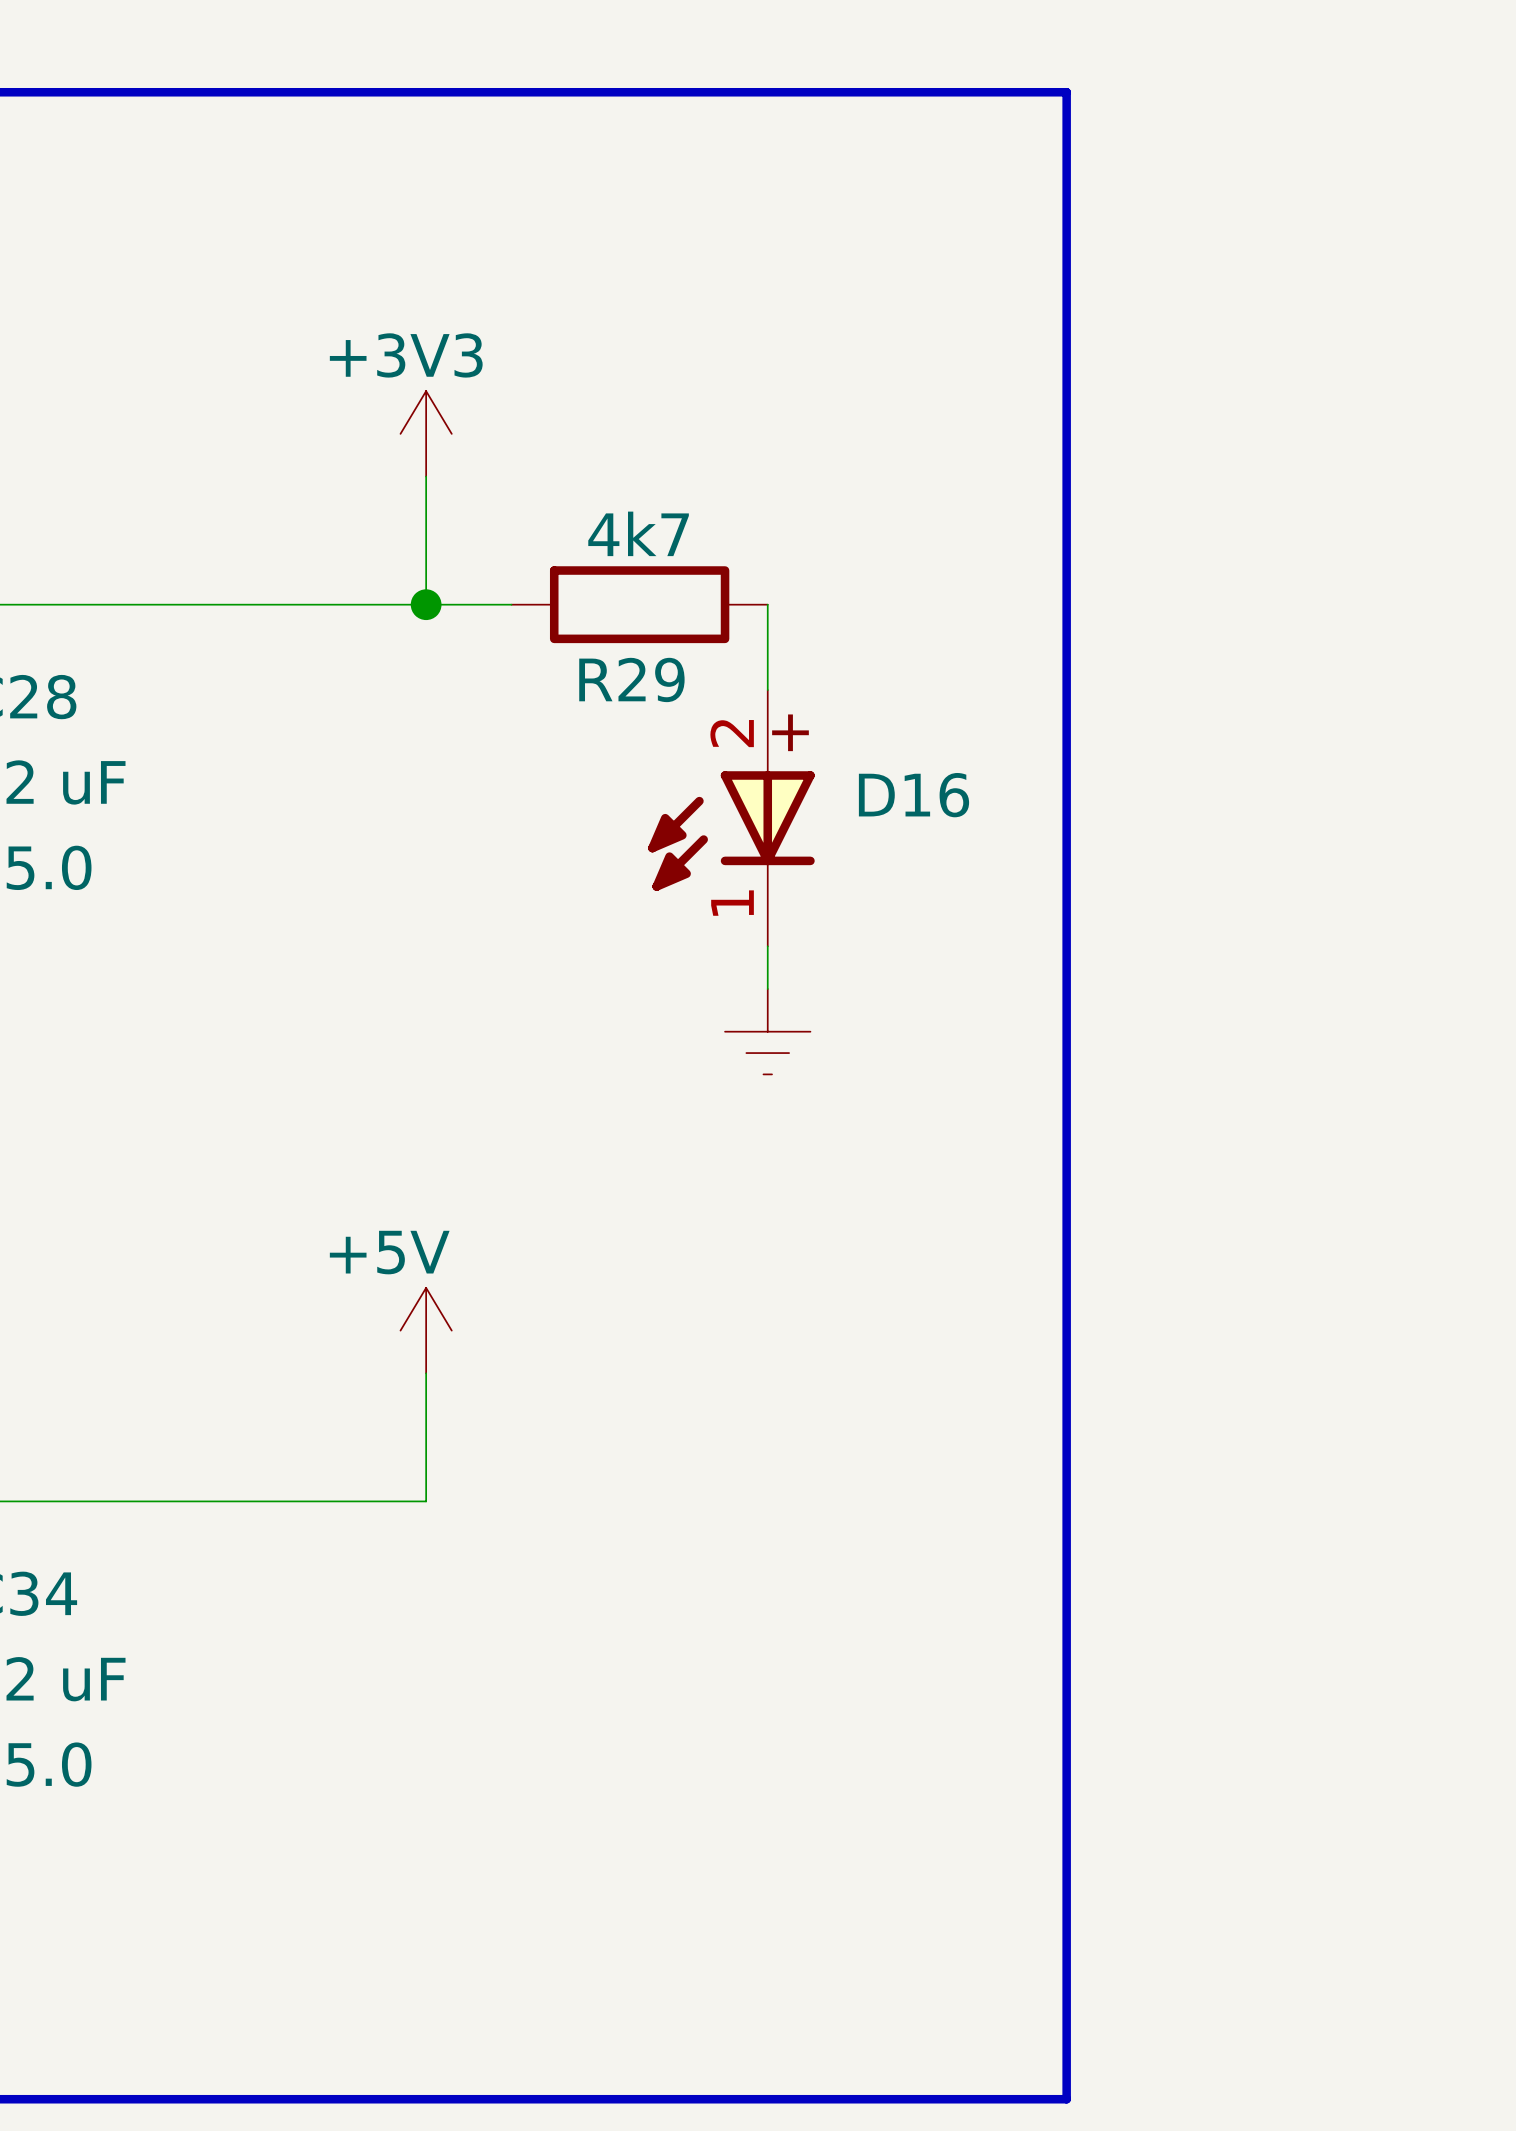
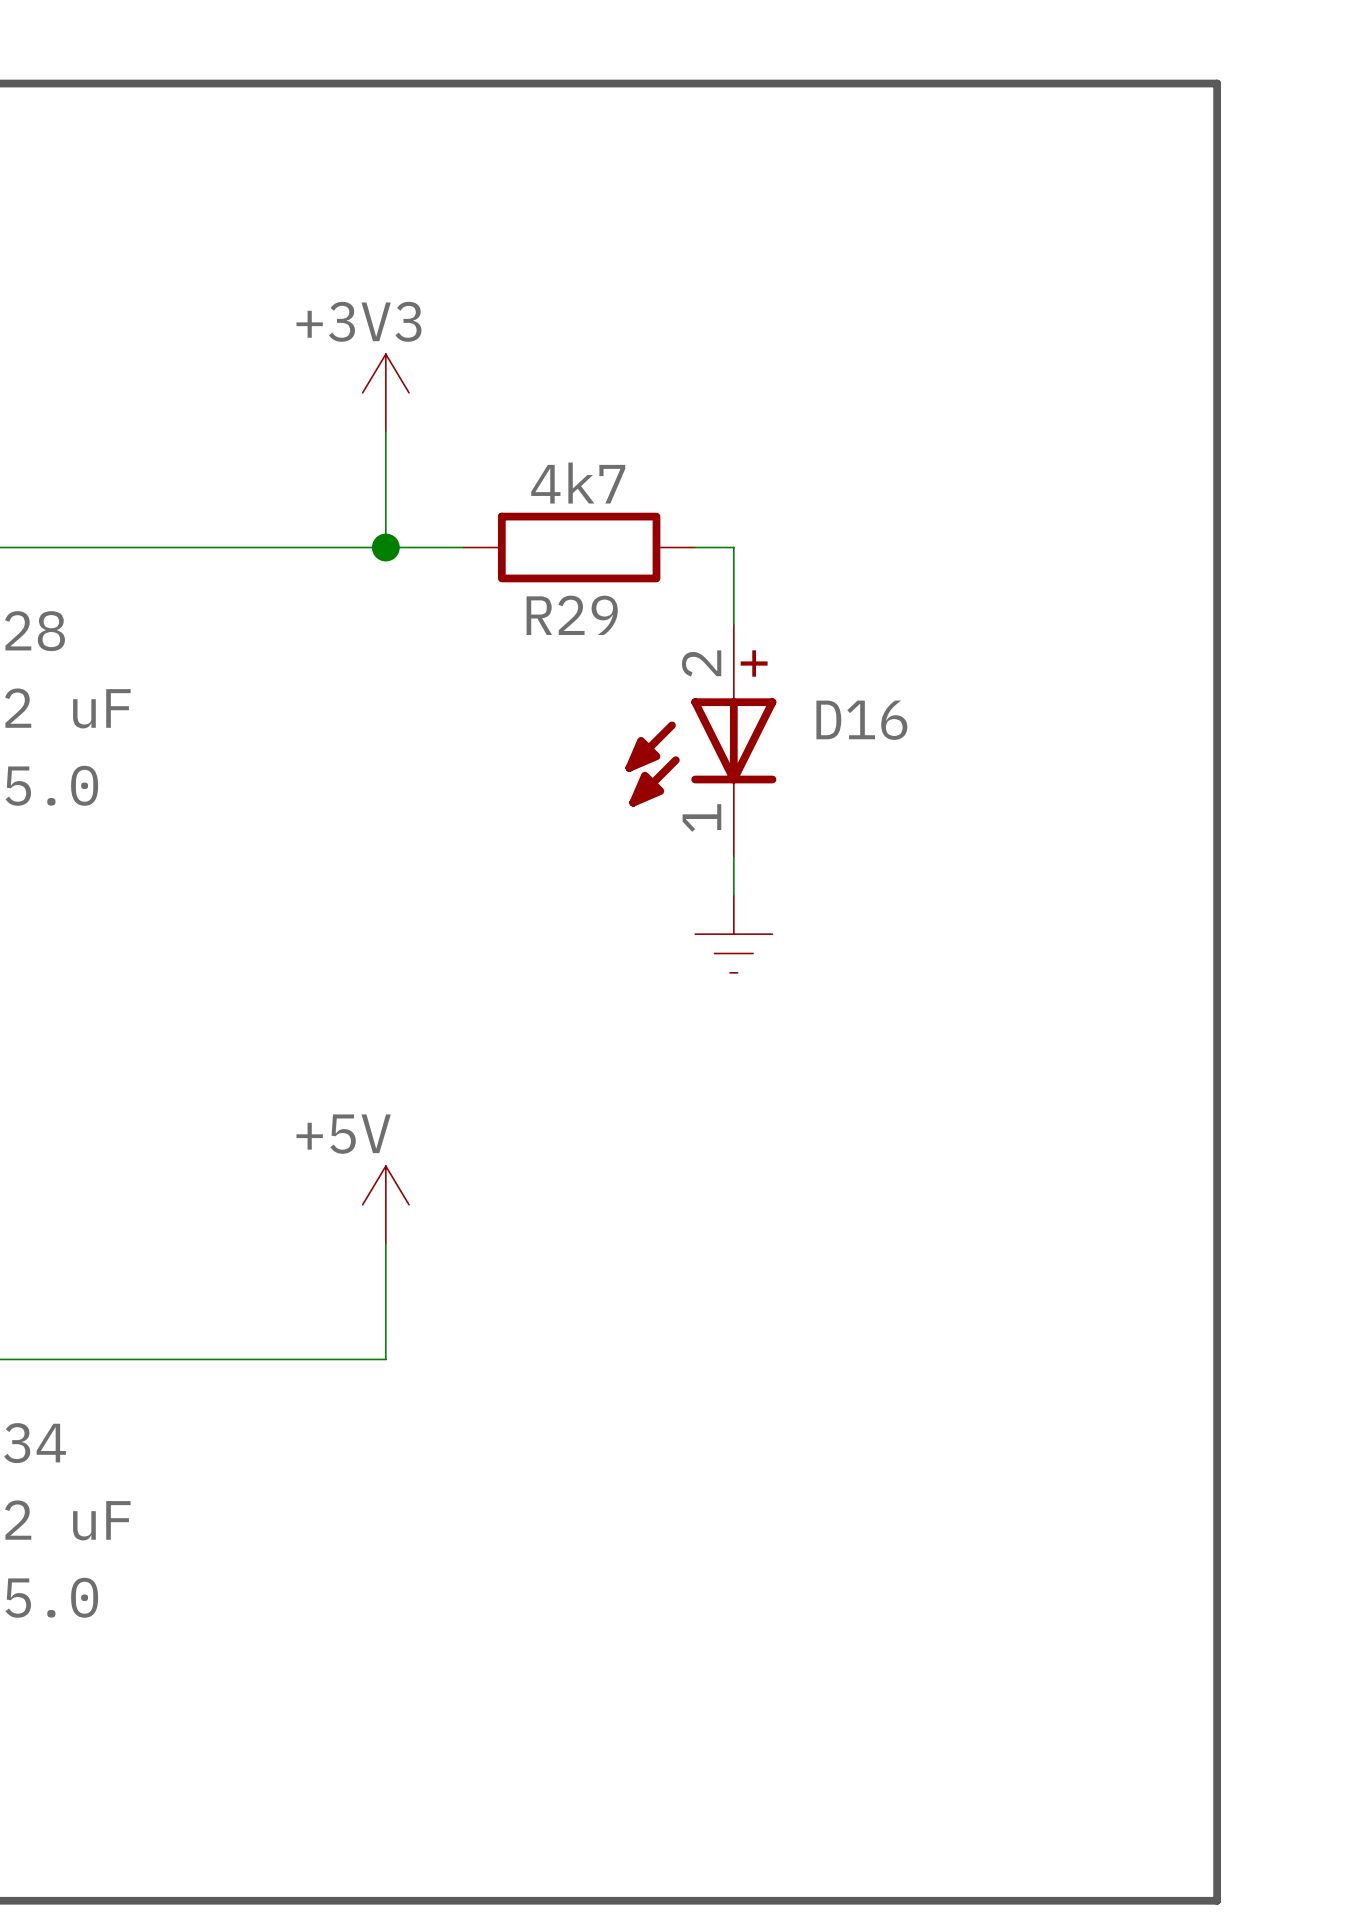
line: (1066, 92) (1066, 2099) -> (965, 83) (1217, 83) (1217, 1900) (965, 1900)
wire: (767, 604) (767, 690) -> (695, 547) (733, 547) (733, 624)
D16 position: (731, 818) -> (700, 740)
wire: (767, 946) (767, 989) -> (733, 856) (733, 895)
power symbol position: (767, 1031) -> (733, 934)

